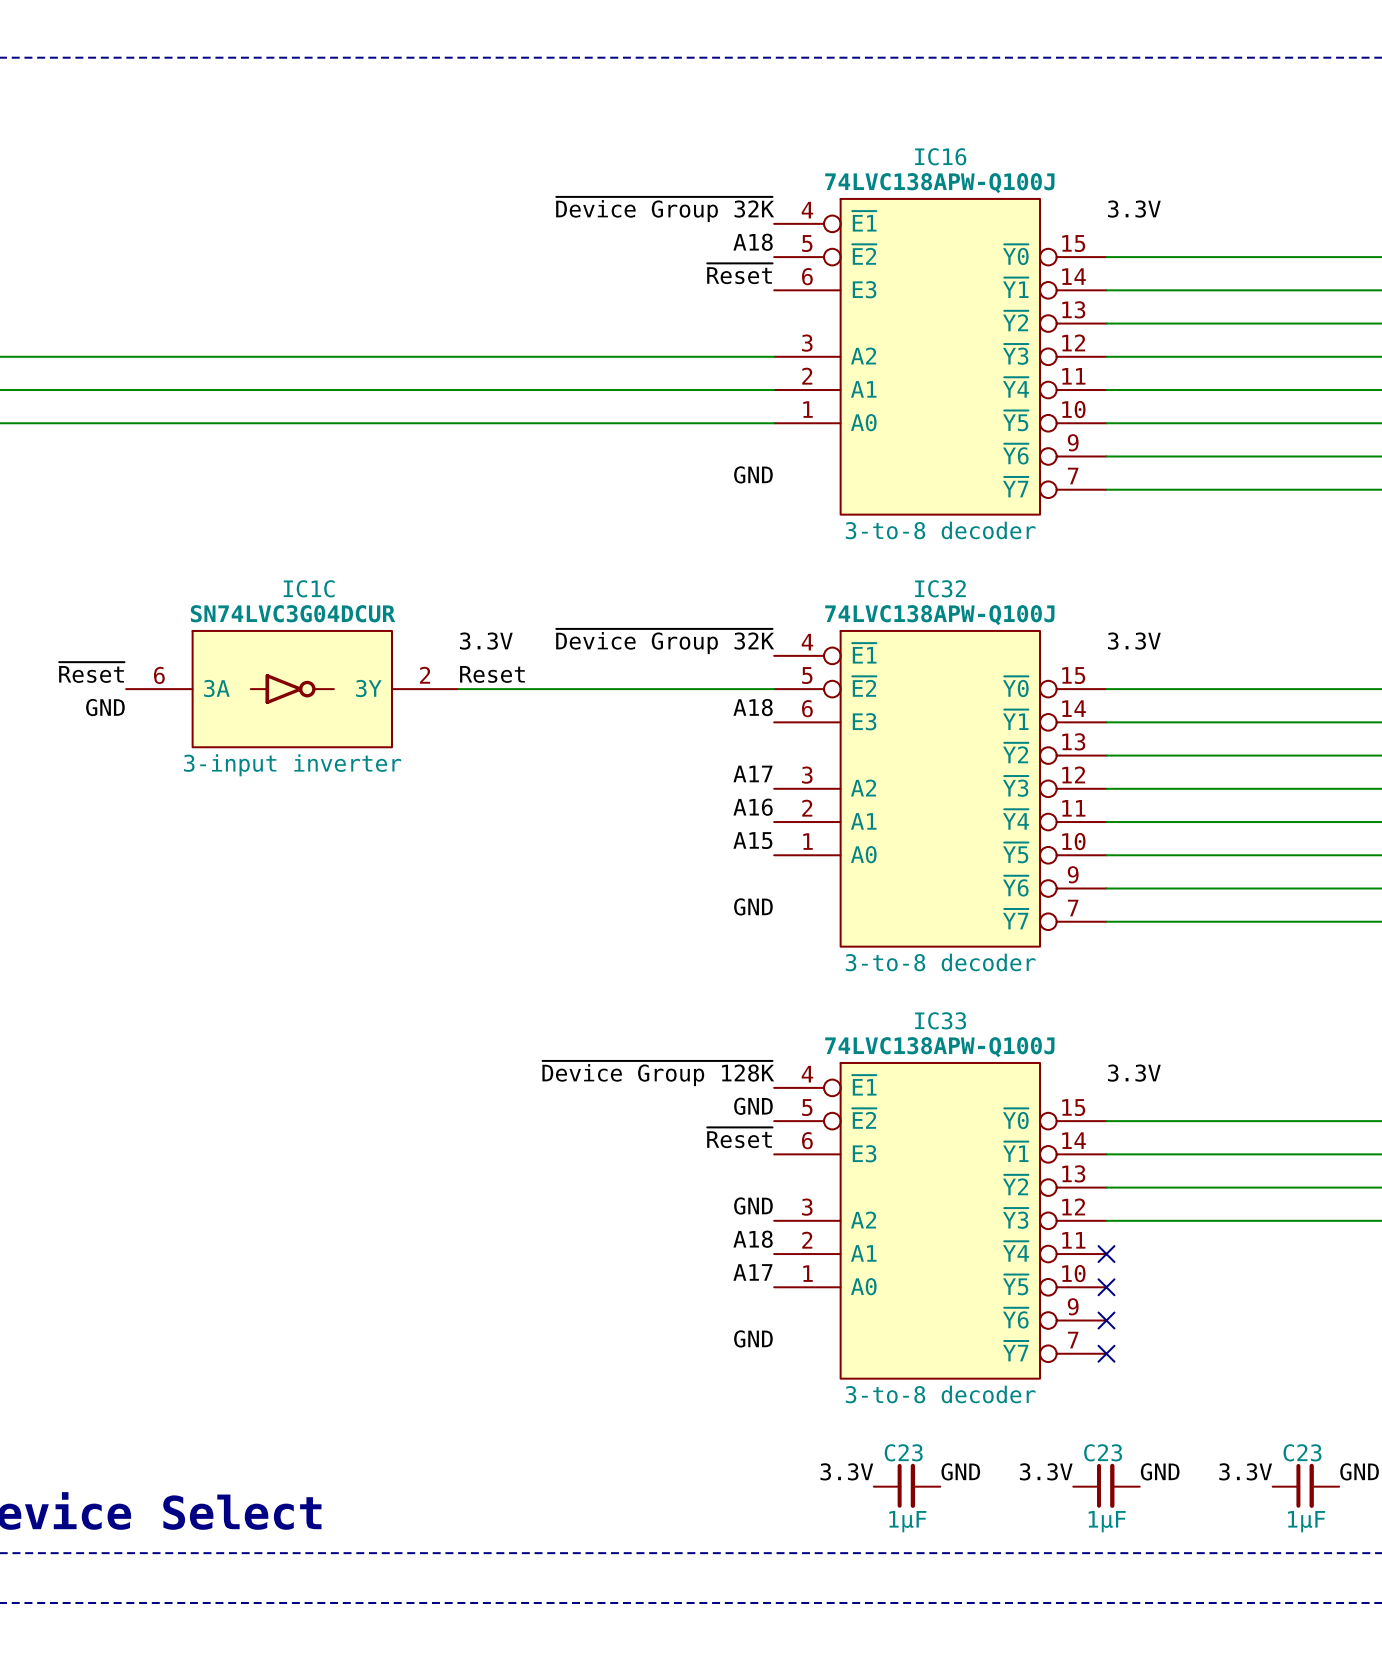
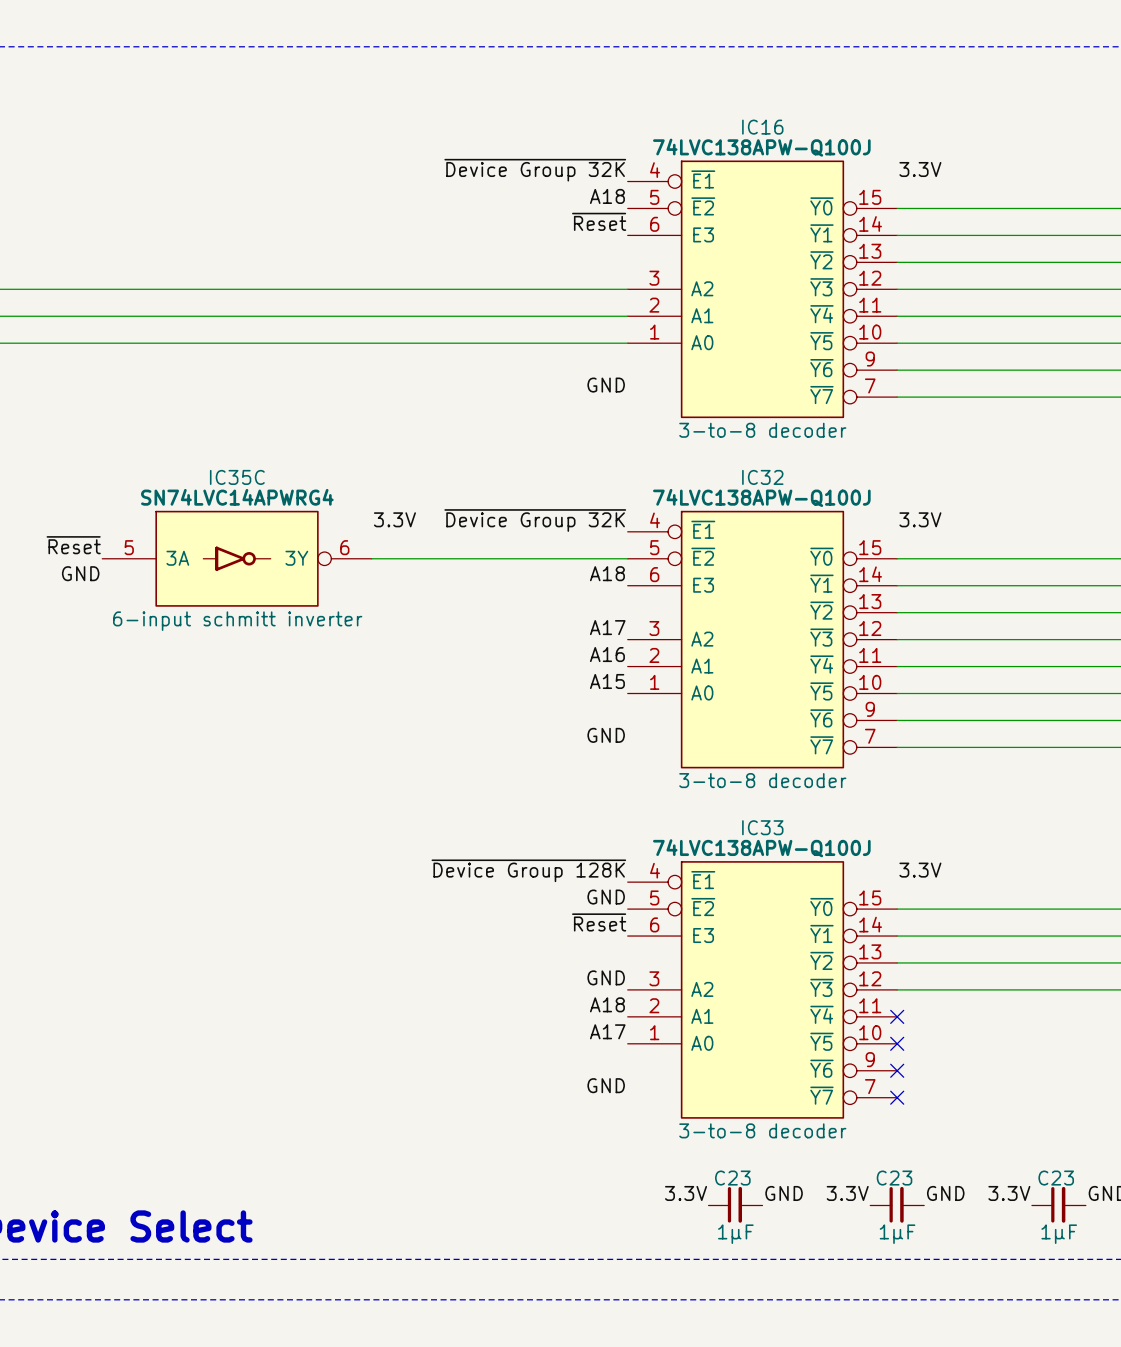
label: Reset (492, 674) -> none
IC1C: SN74LVC3G04DCUR (292, 689) -> none
IC35C: none -> SN74LVC14APWRG4 (237, 558)

